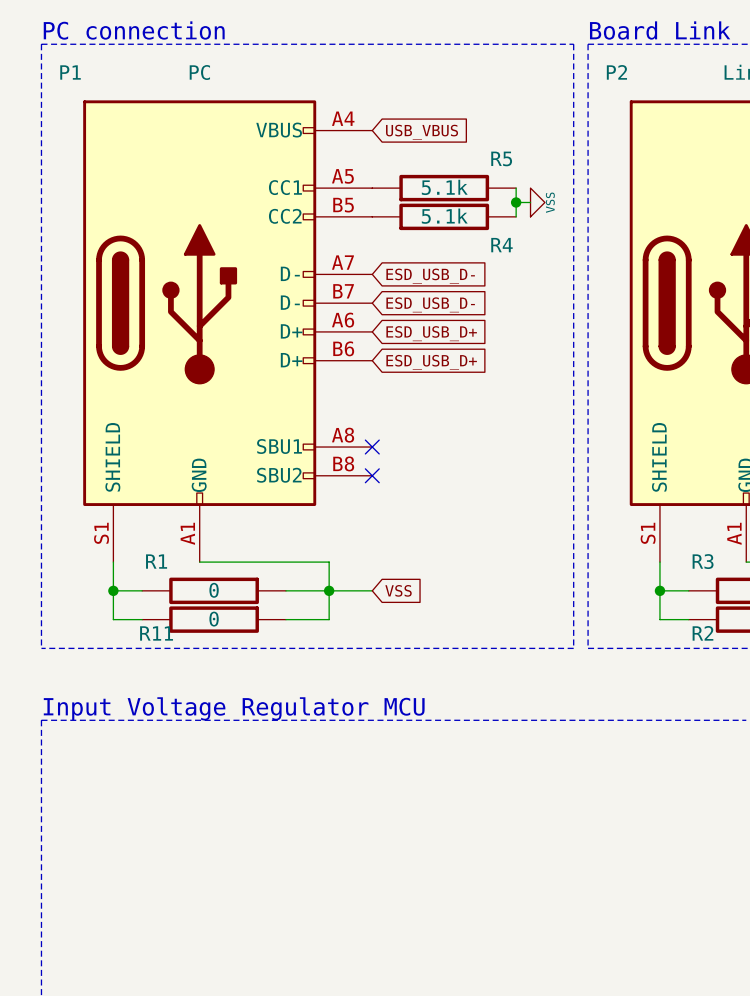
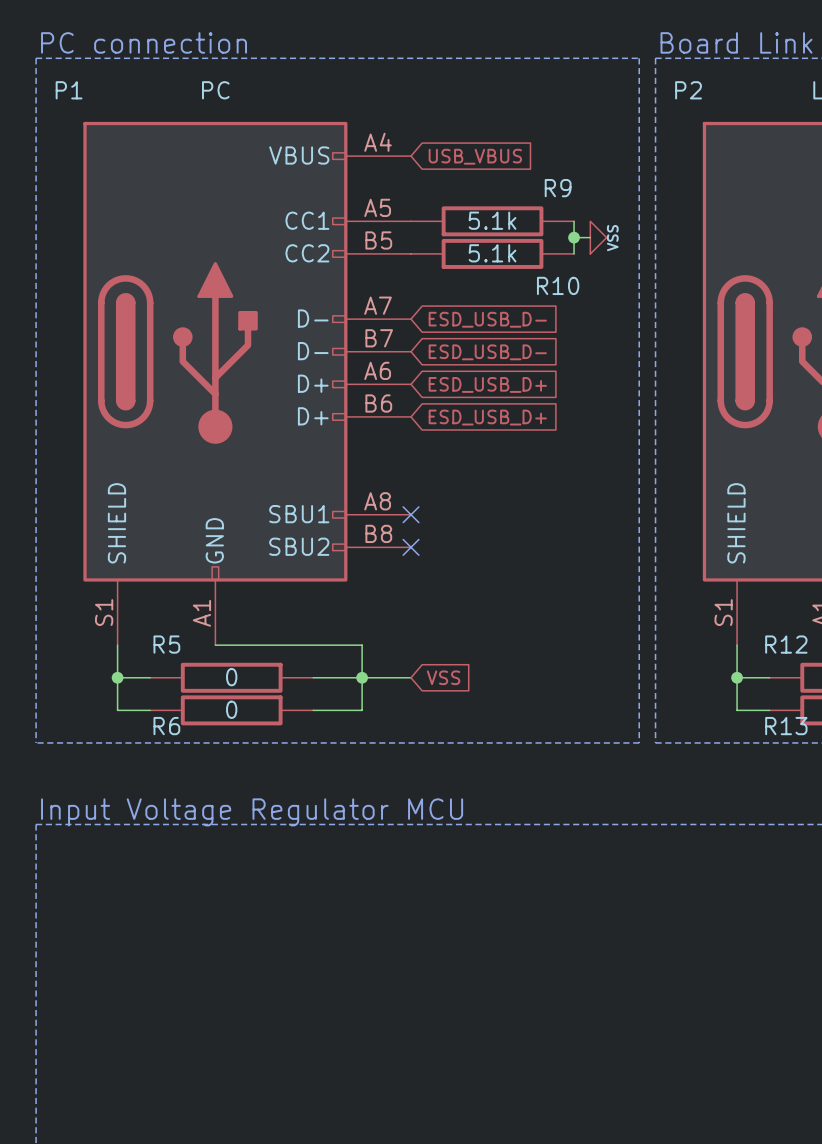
R5 name: R5 (501, 158) -> R9 (558, 188)
R4 name: R4 (501, 245) -> R10 (558, 285)
R1 name: R1 (156, 561) -> R5 (166, 644)
R3 name: R3 (703, 561) -> R12 (786, 644)
R11 name: R11 (156, 633) -> R6 (166, 726)
R2 name: R2 (702, 633) -> R13 (786, 726)

